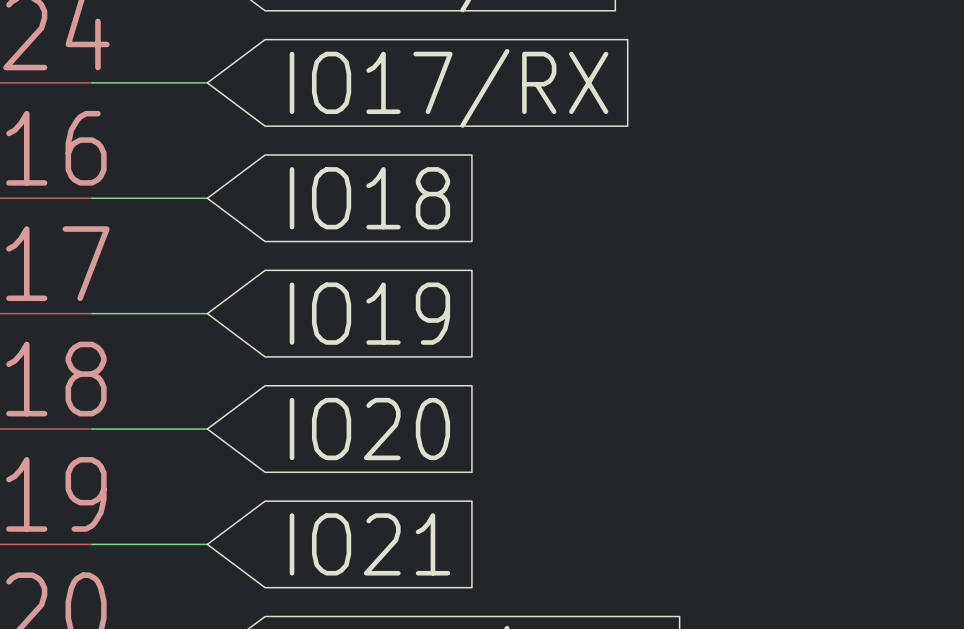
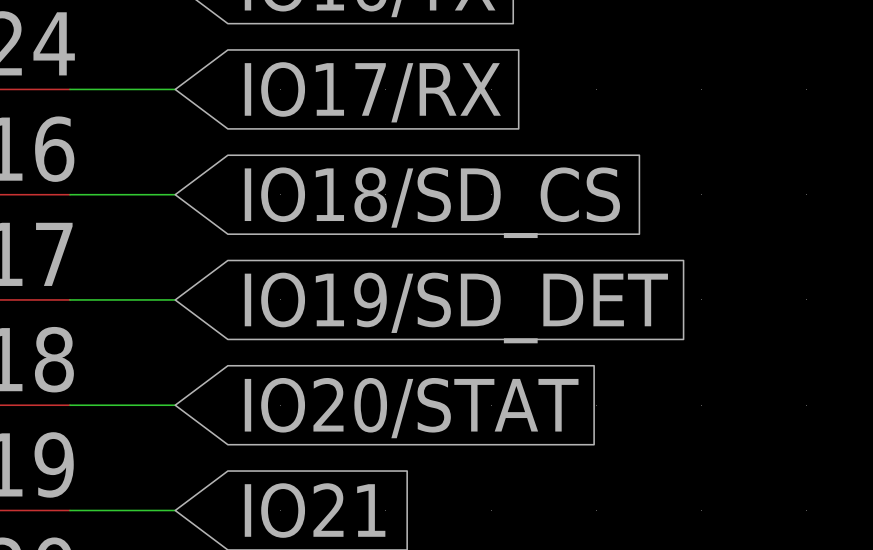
global label: IO18 (369, 198) -> IO18/SD_CS (432, 202)
global label: IO19 (369, 313) -> IO19/SD_DET (456, 308)
global label: IO20 (369, 429) -> IO20/STAT (411, 408)

